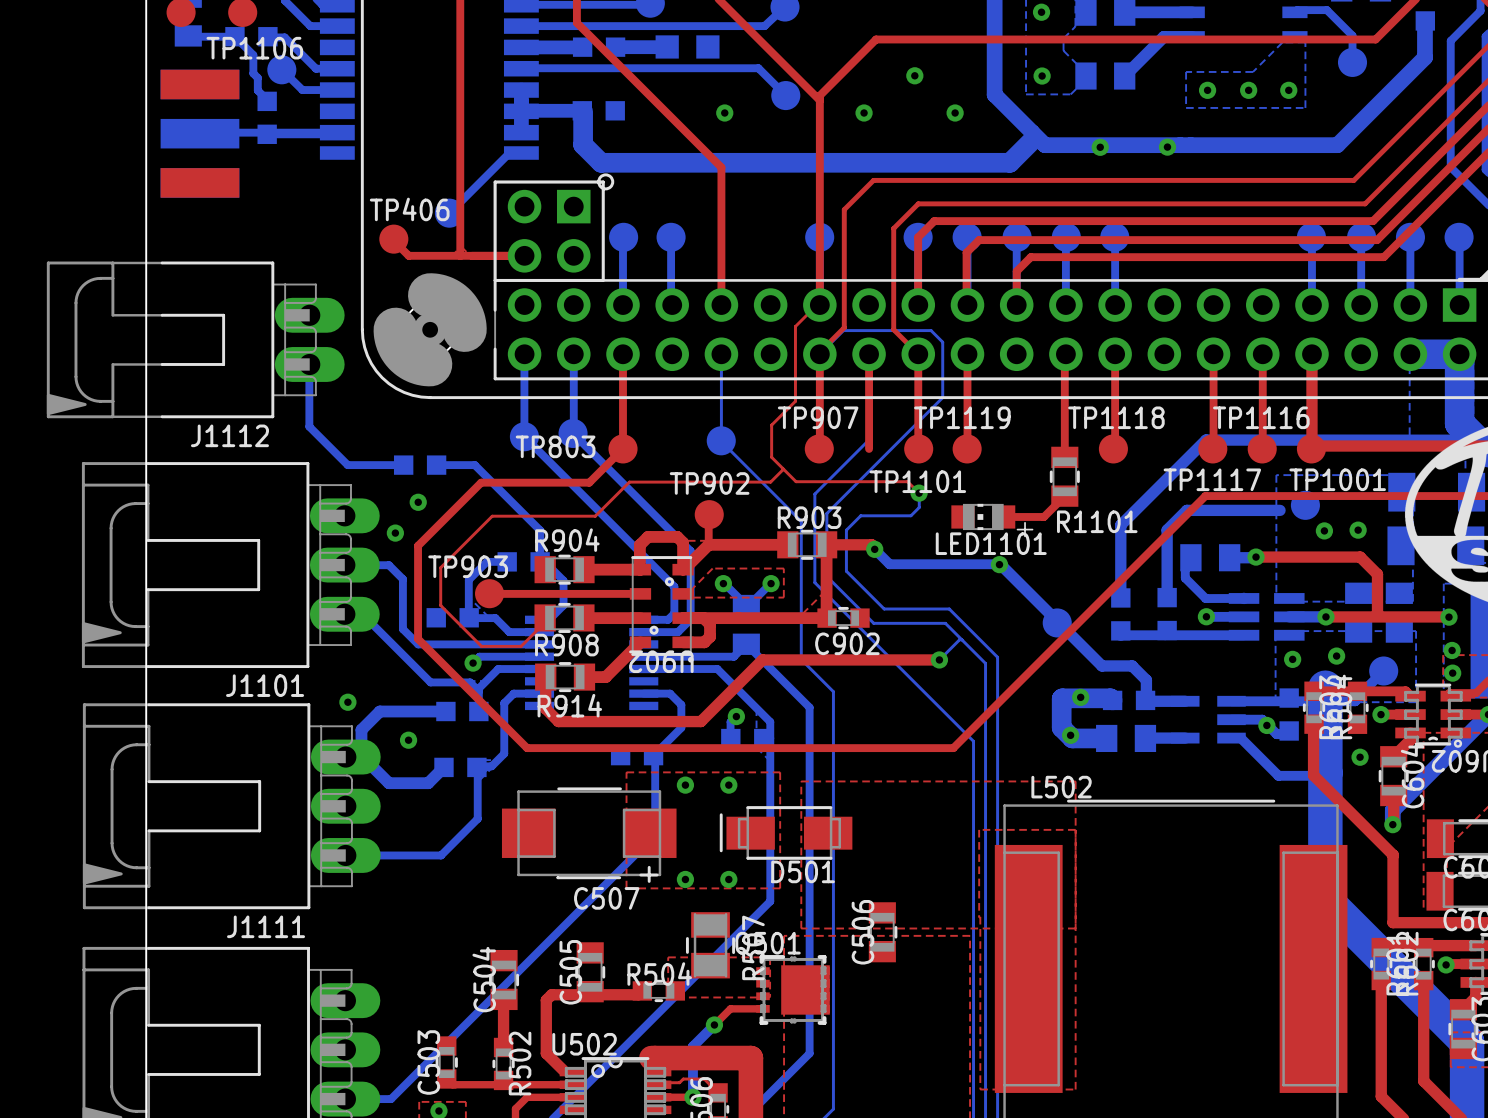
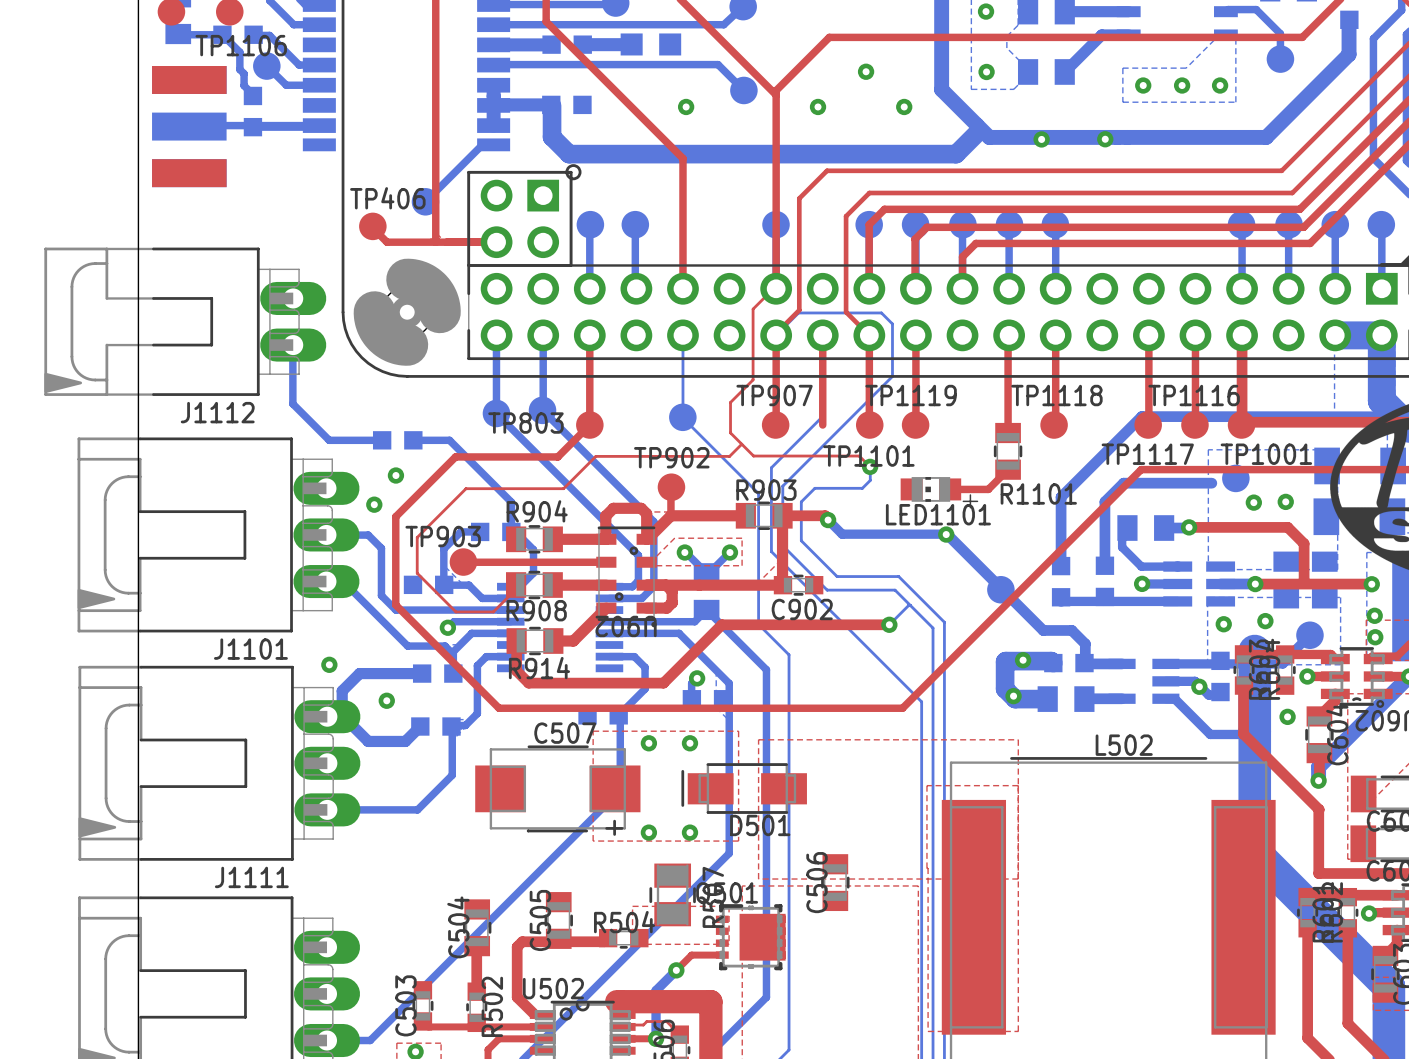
L502 name position: L502 (1061, 787) -> L502 (1124, 745)
C507 name position: C507 (606, 898) -> C507 (565, 733)

